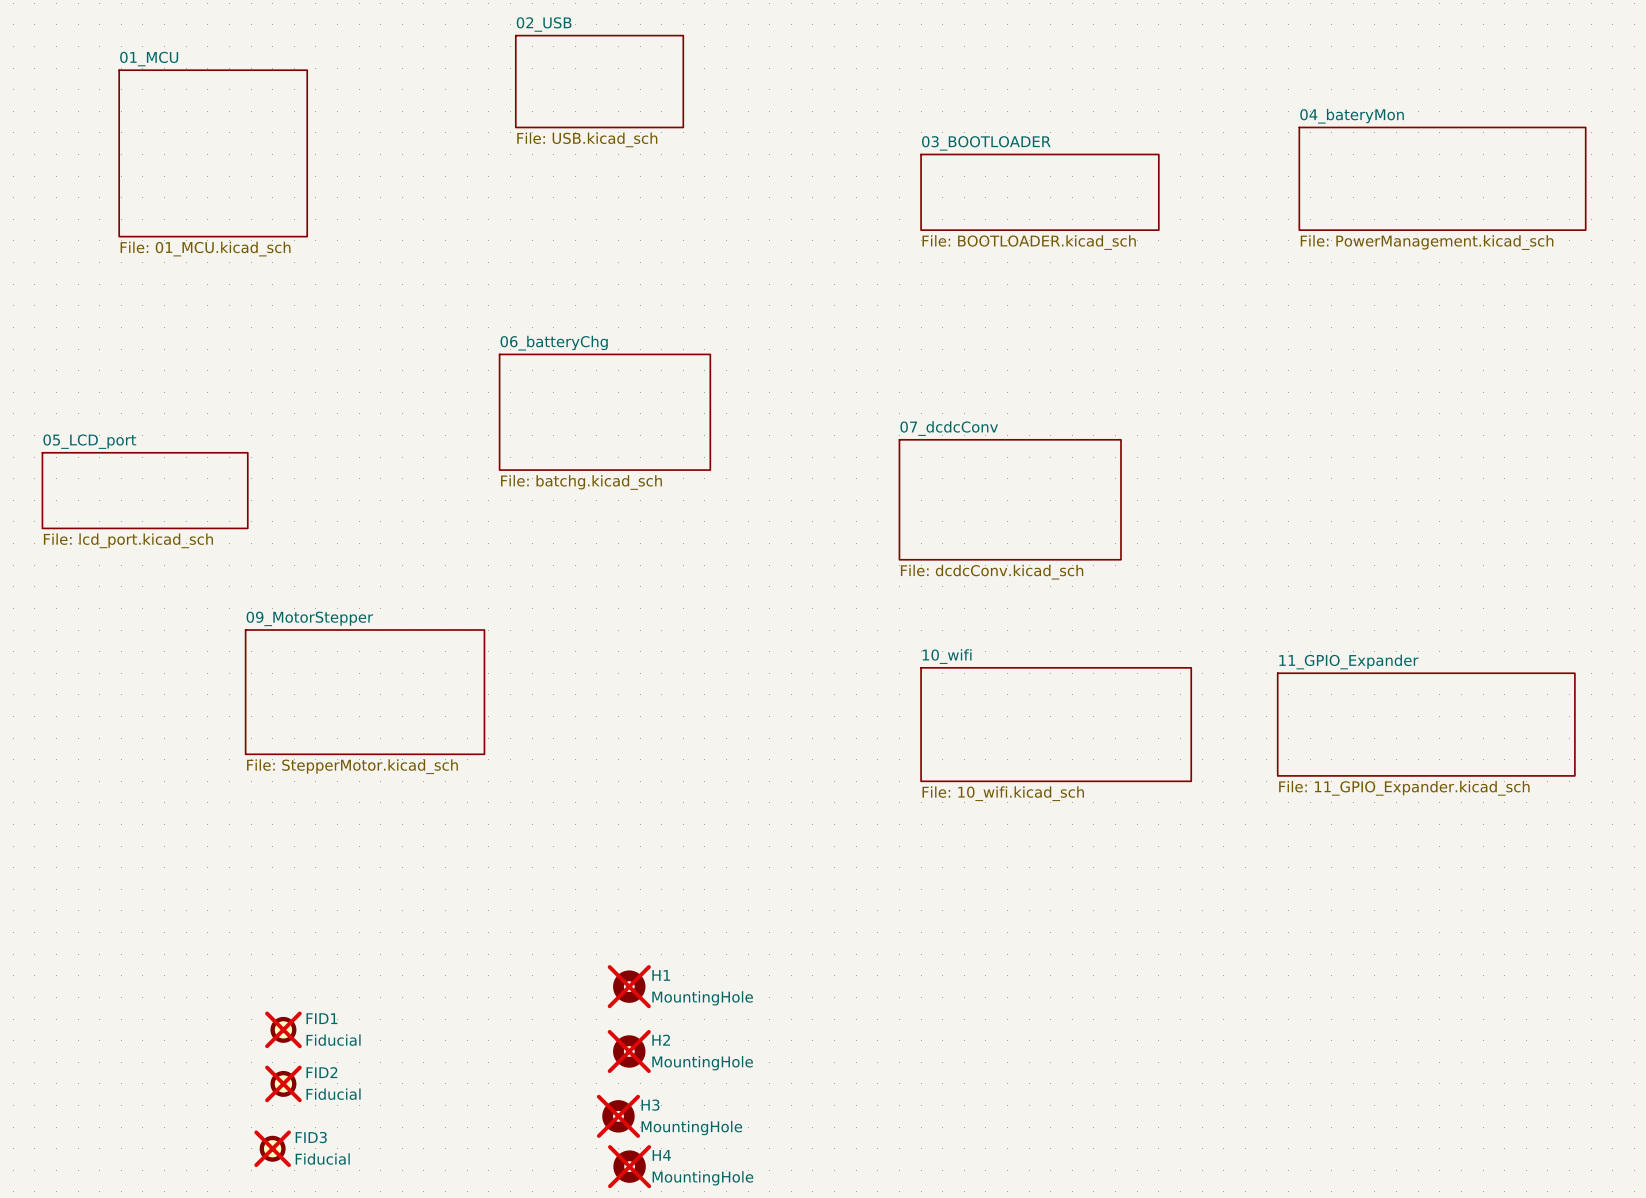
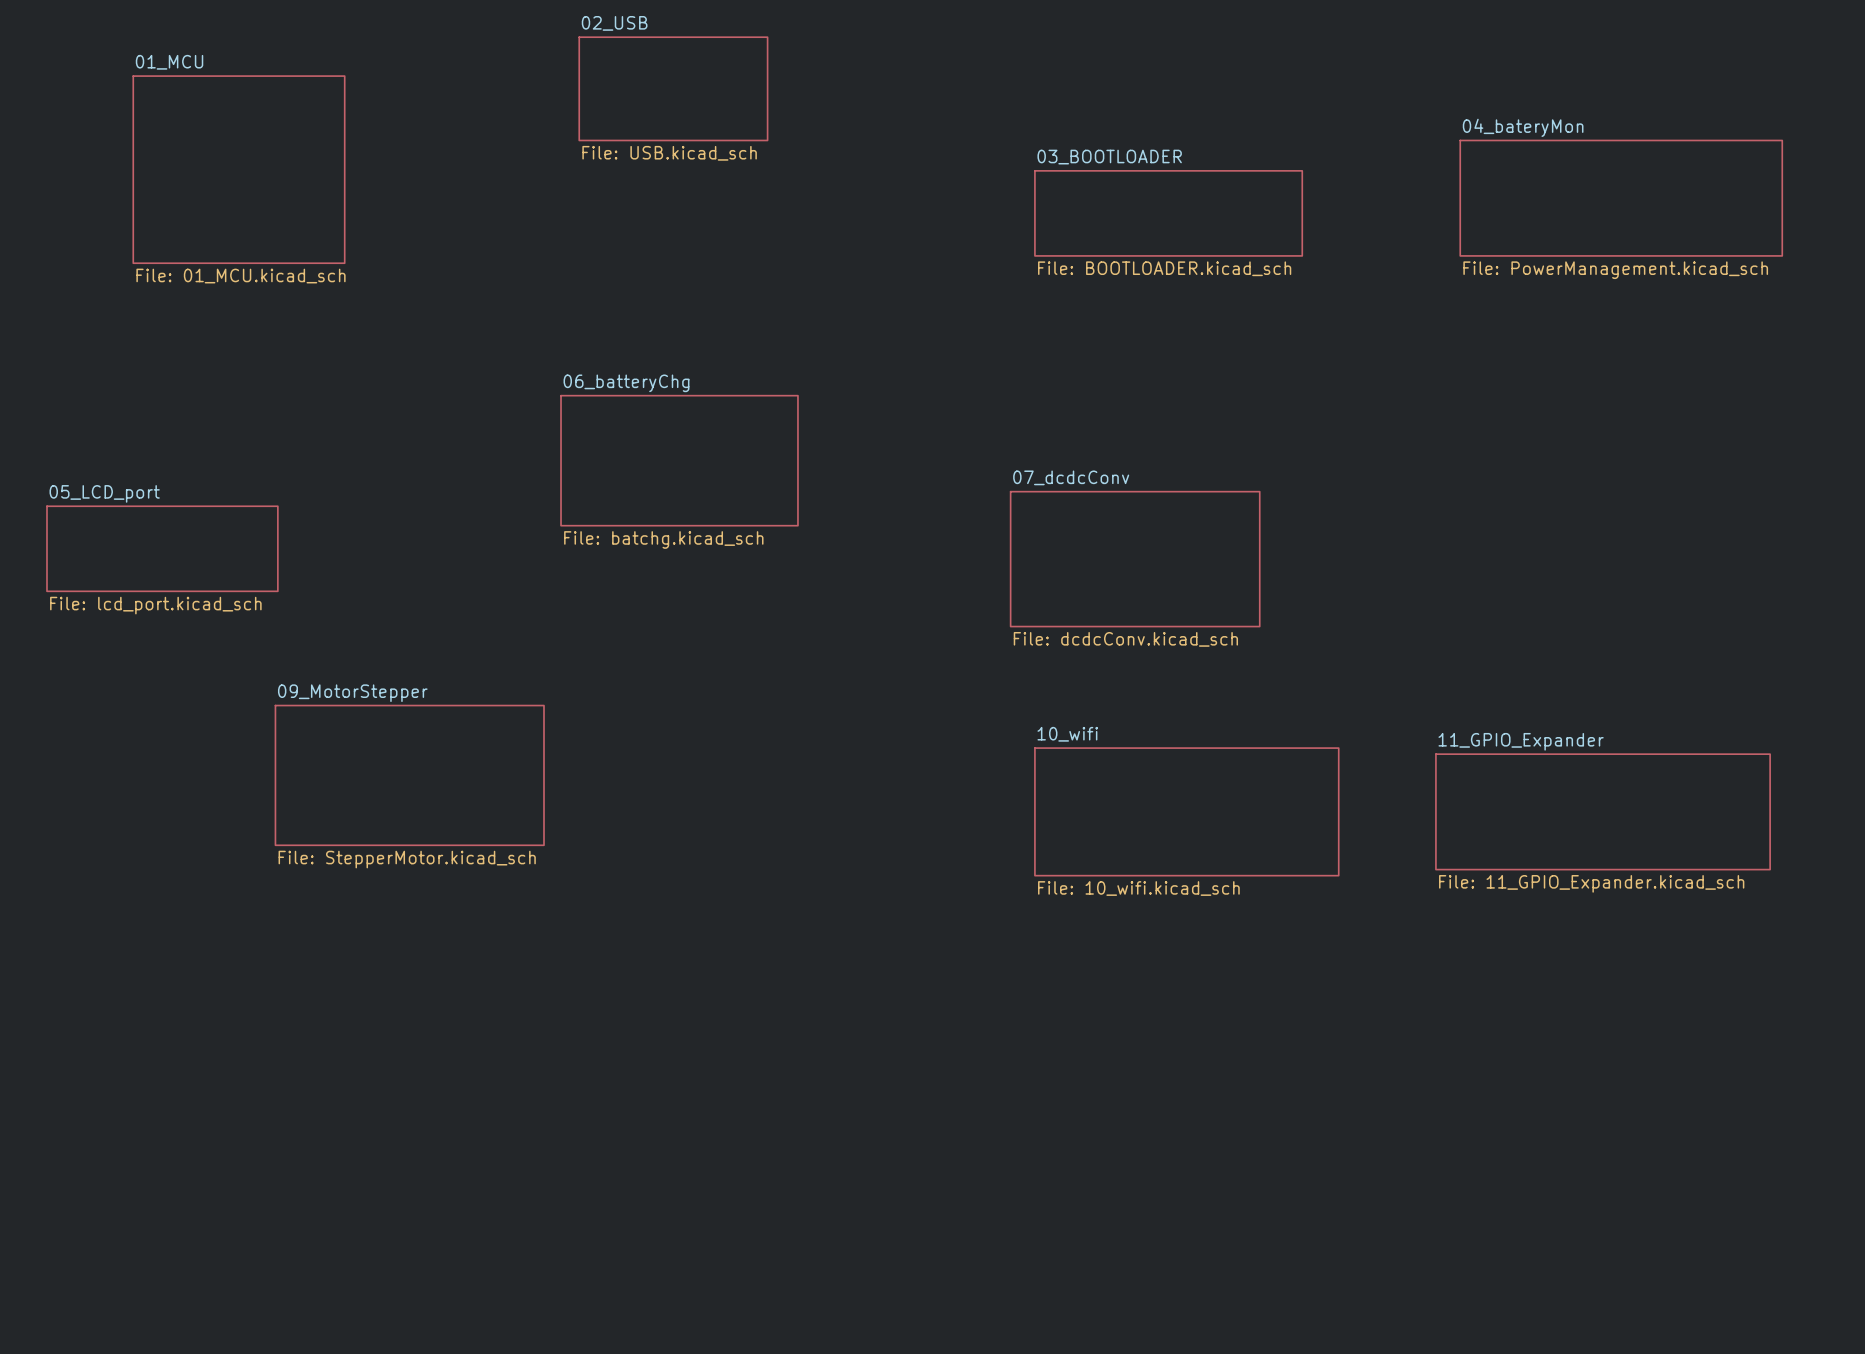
H1: MountingHole (629, 986) -> none
FID1: Fiducial (283, 1029) -> none
H2: MountingHole (629, 1051) -> none
FID2: Fiducial (283, 1083) -> none
H3: MountingHole (618, 1116) -> none
FID3: Fiducial (272, 1148) -> none
H4: MountingHole (629, 1166) -> none

